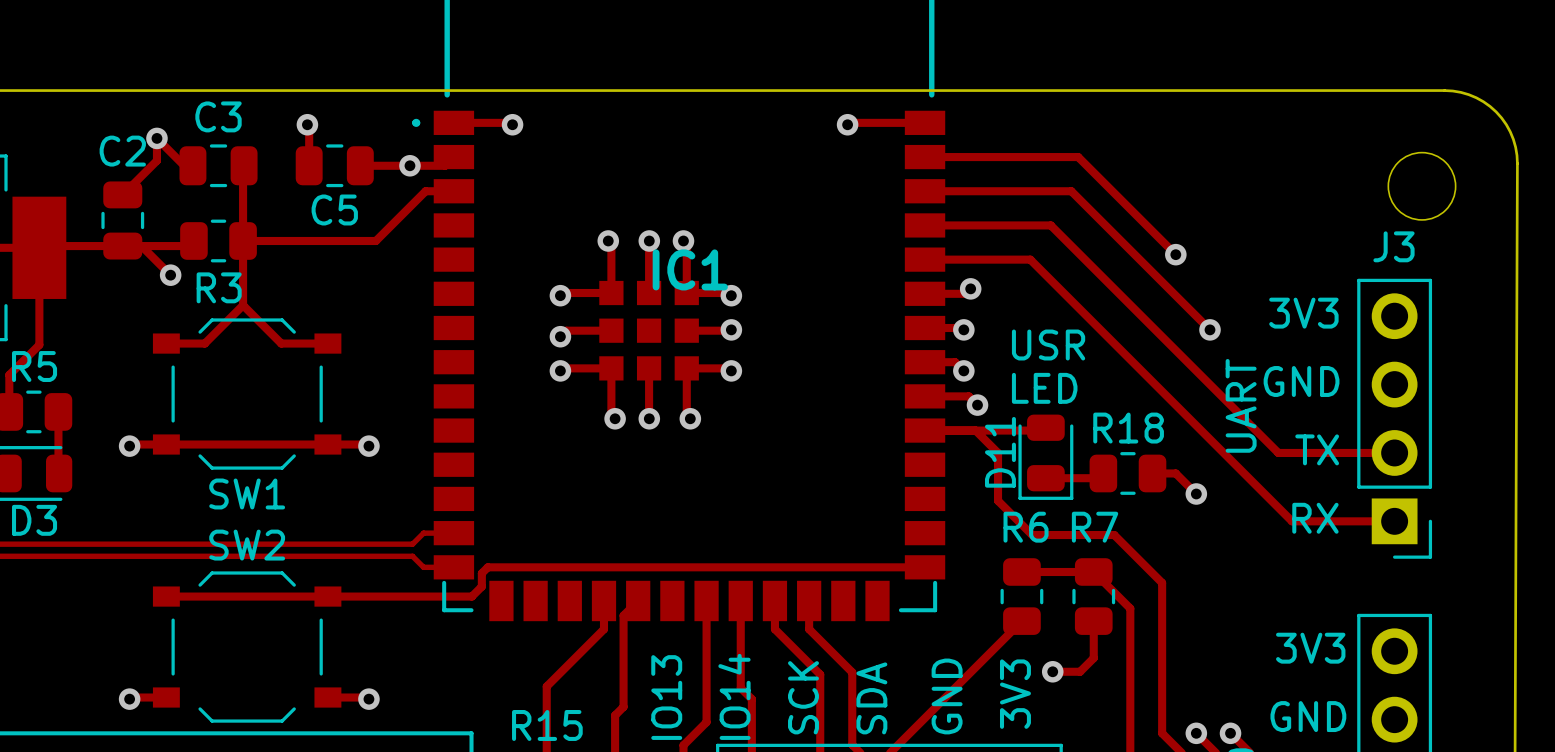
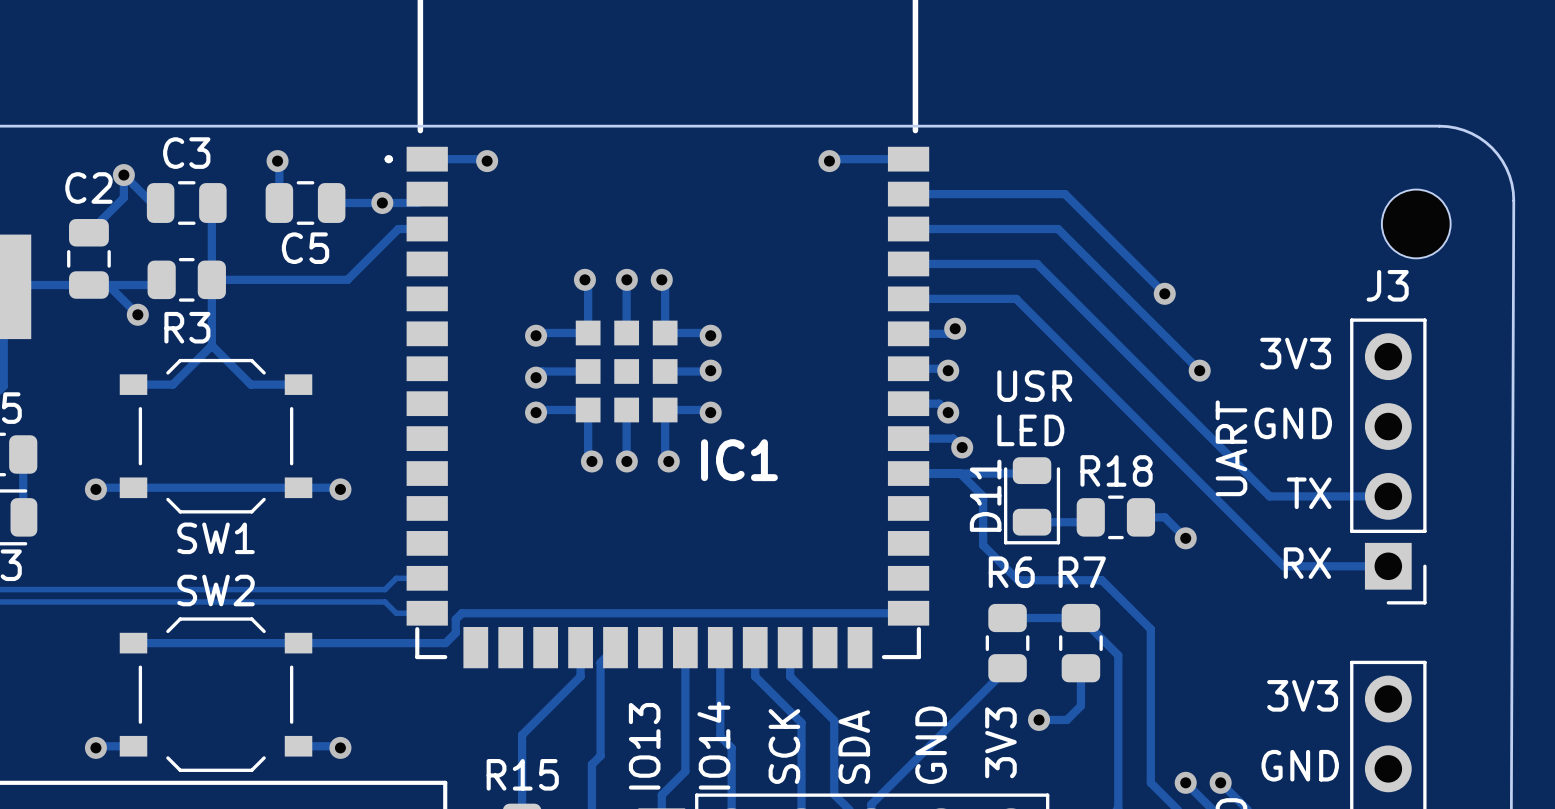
IC1 name position: IC1 (690, 269) -> IC1 (739, 460)

